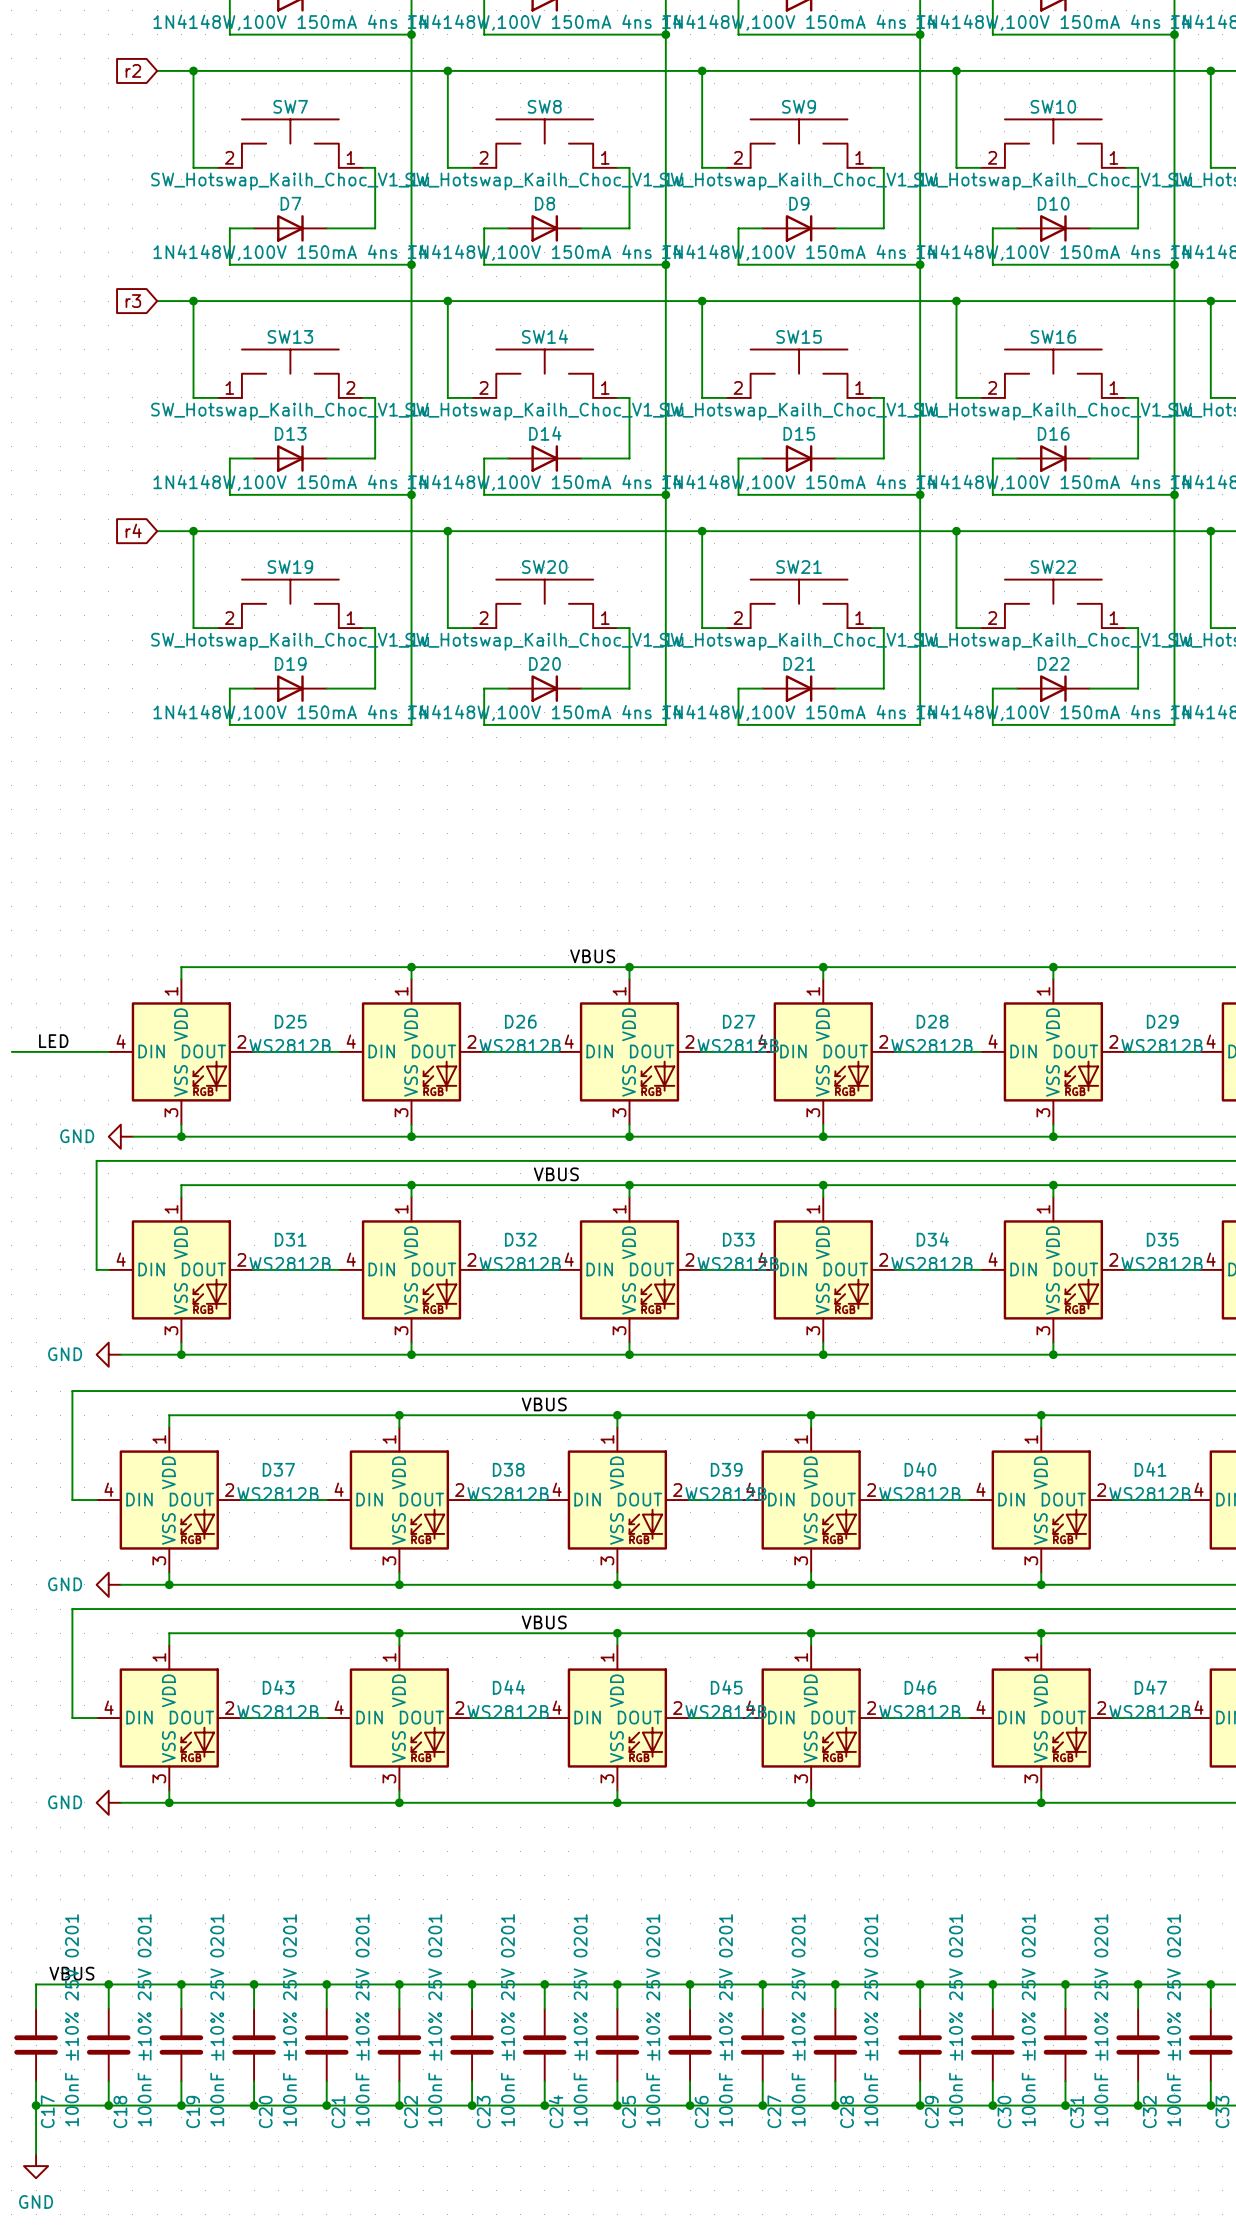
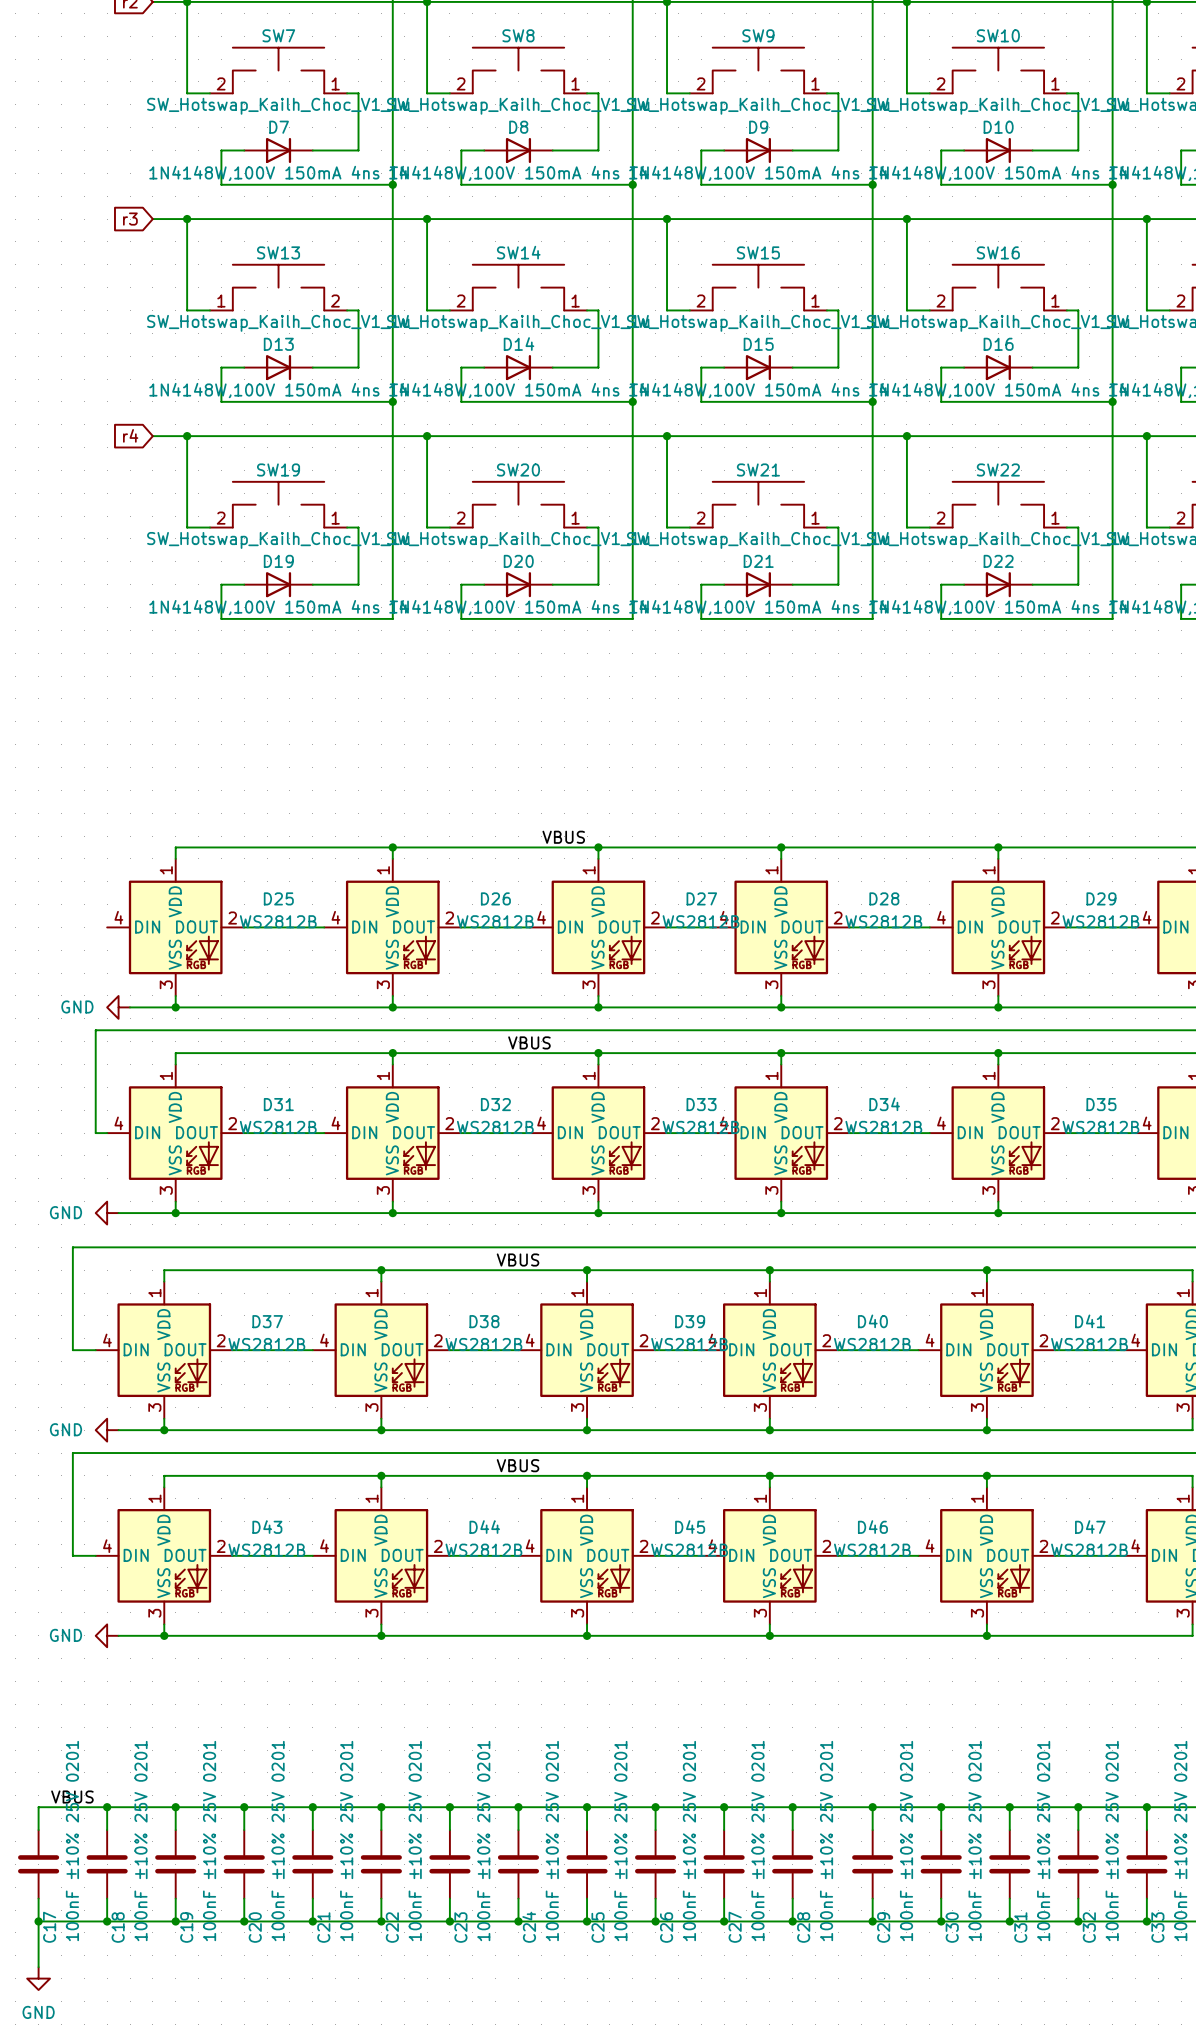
label: LED (53, 1041) -> none
wire: (11, 1051) (108, 1051) -> none

